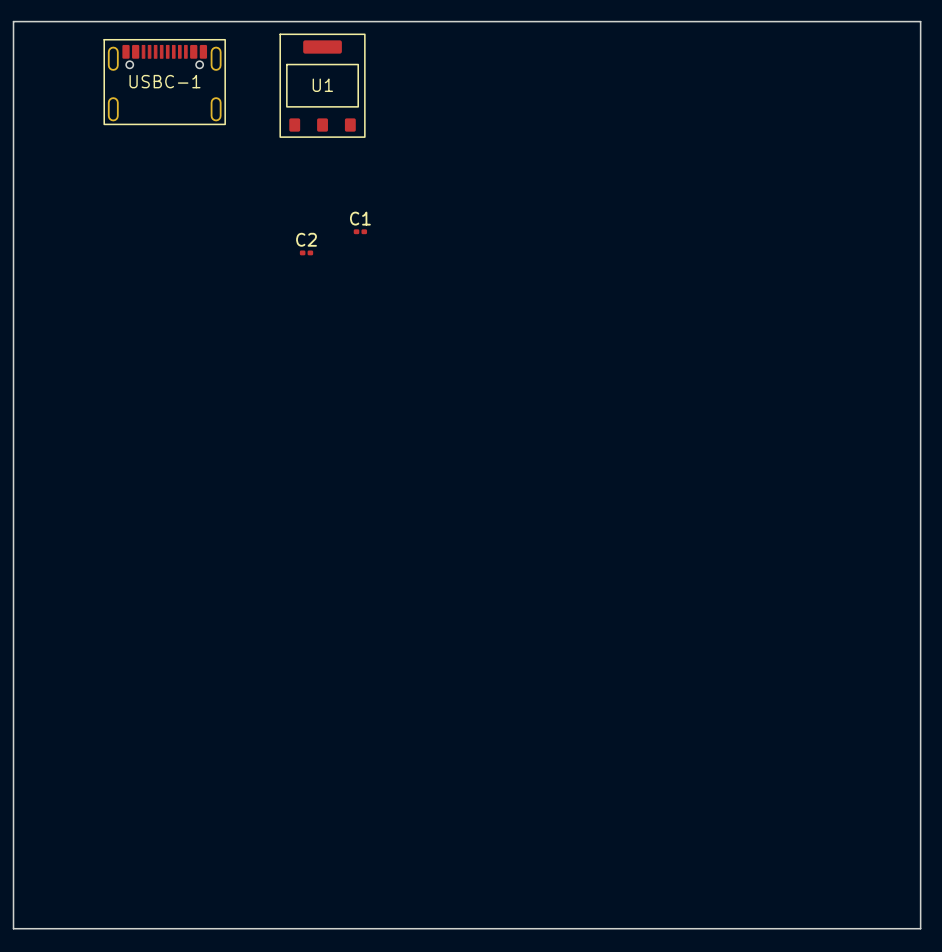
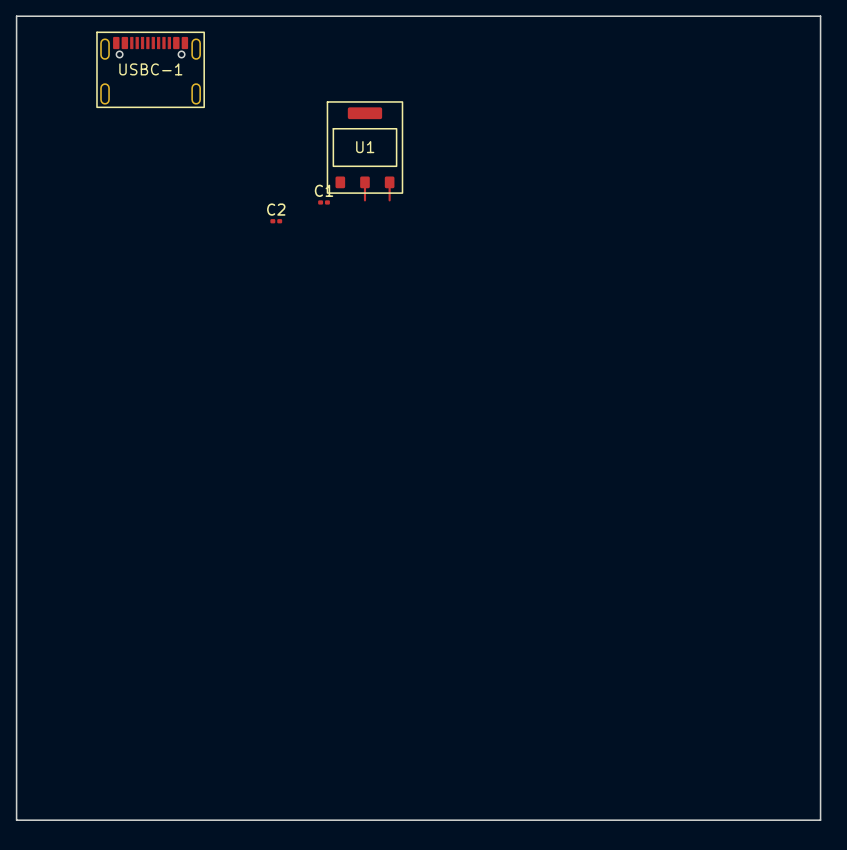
U1 position: (322, 85) -> (364, 147)
track: none -> (364, 182) (364, 200)
track: none -> (389, 182) (389, 200)

